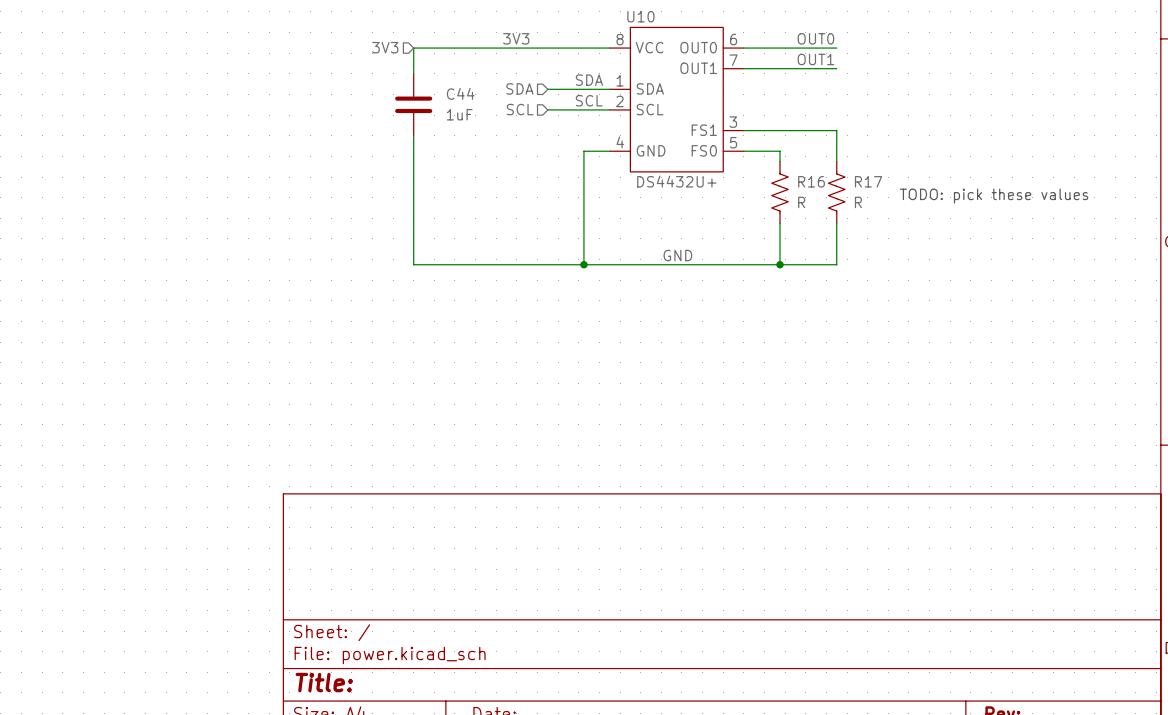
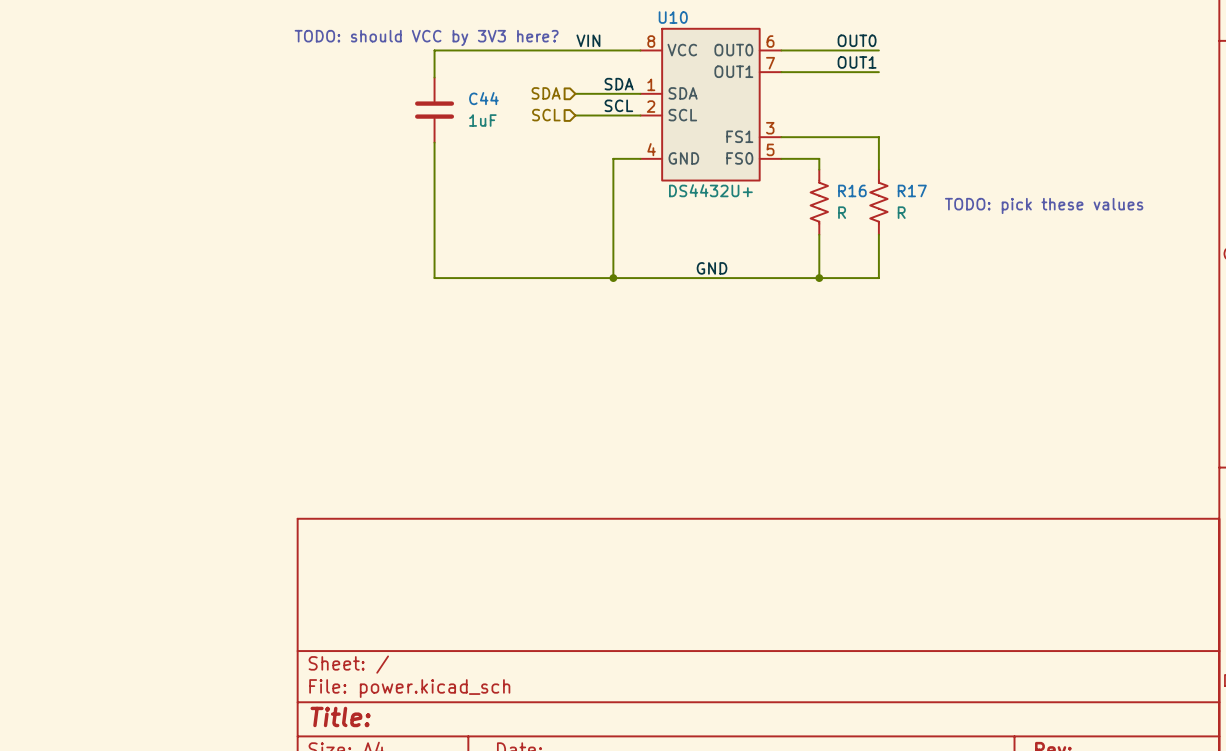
text: none -> TODO: should VCC by 3V3 here? (426, 37)
label: 3V3 (516, 38) -> none
label: none -> VIN (588, 40)
hierarchical label: 3V3 (385, 47) -> none

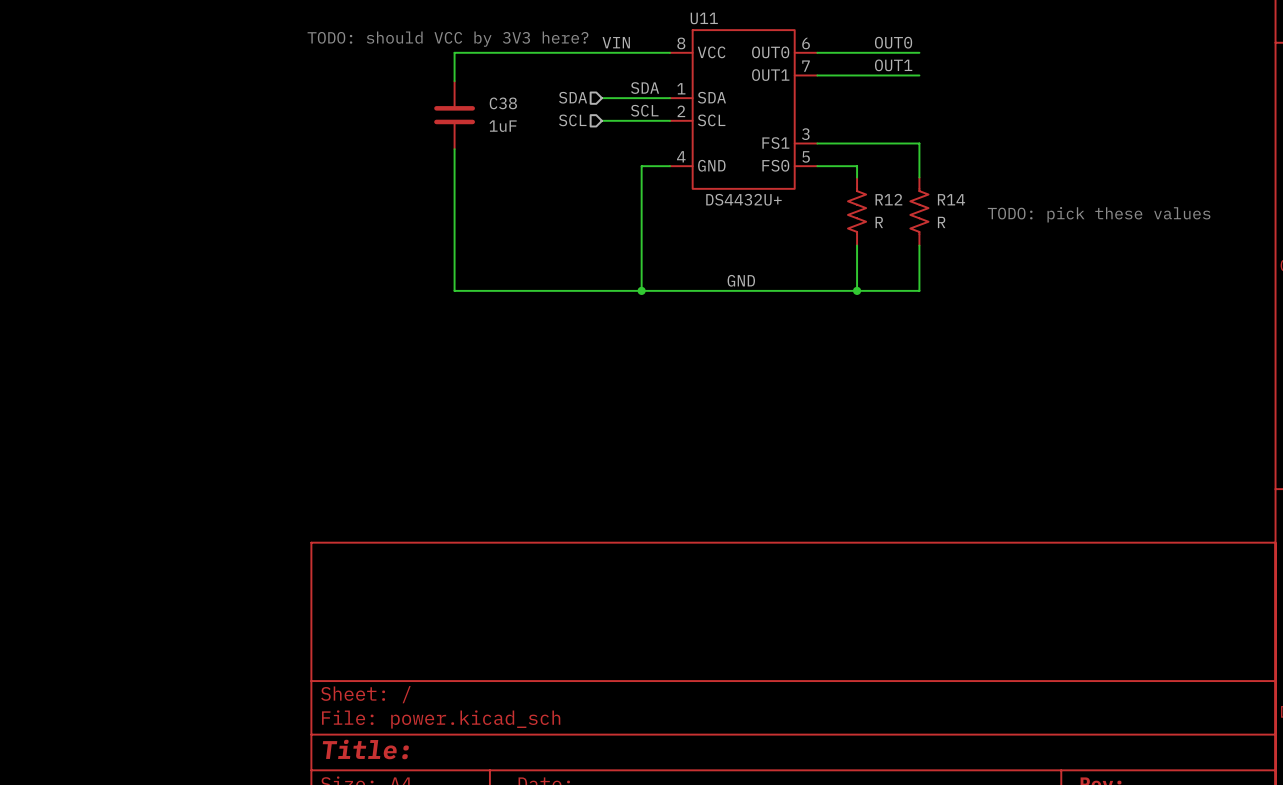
U10 name: U10 (673, 17) -> U11 (704, 18)
C44 name: C44 (483, 98) -> C38 (503, 103)
R16 name: R16 (852, 190) -> R12 (888, 199)
R17 name: R17 (912, 190) -> R14 (951, 199)

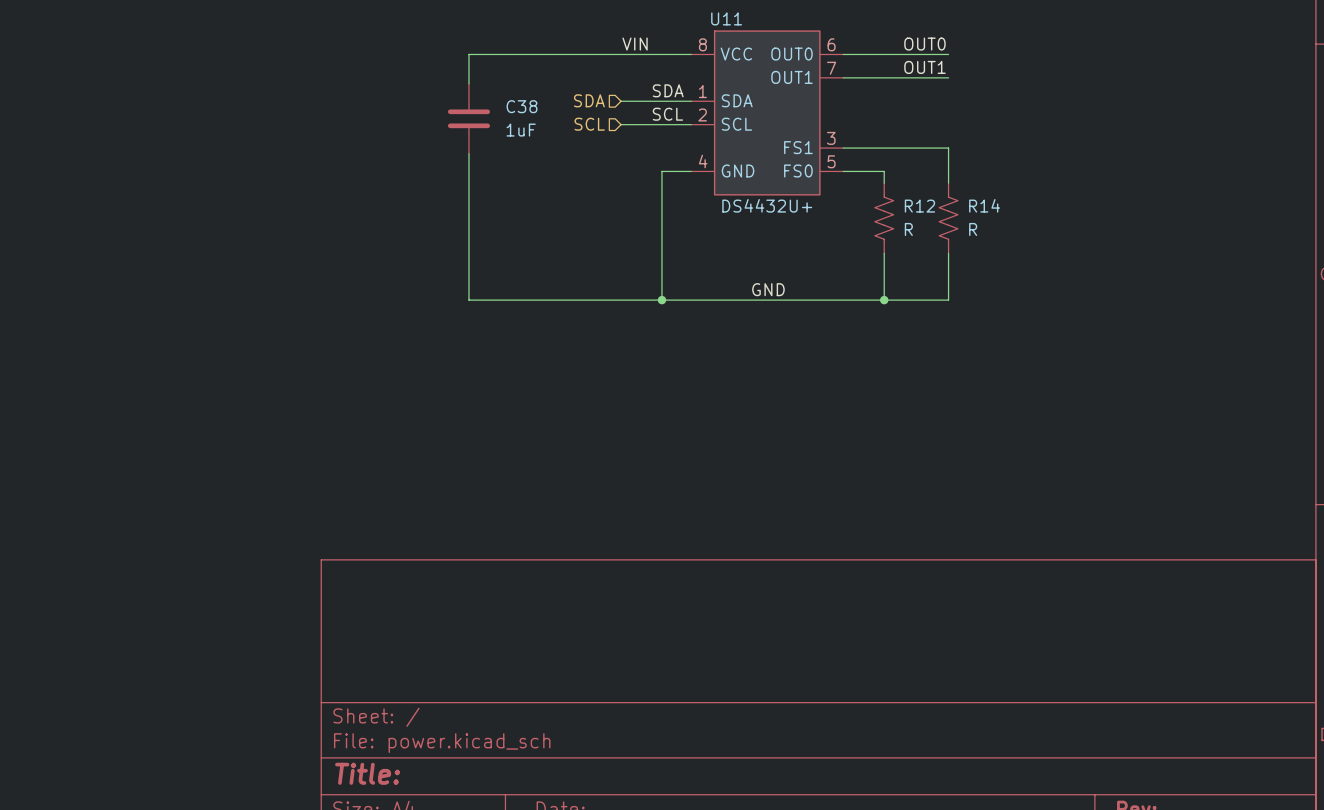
text: TODO: should VCC by 3V3 here? (447, 39) -> none
text: TODO: pick these values (1099, 214) -> none

